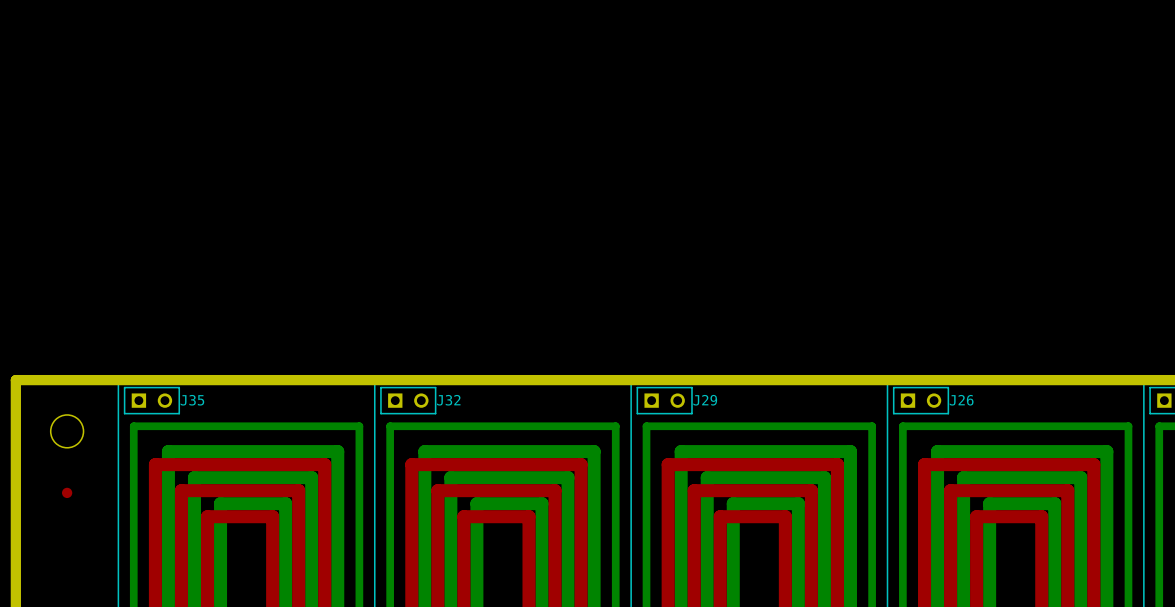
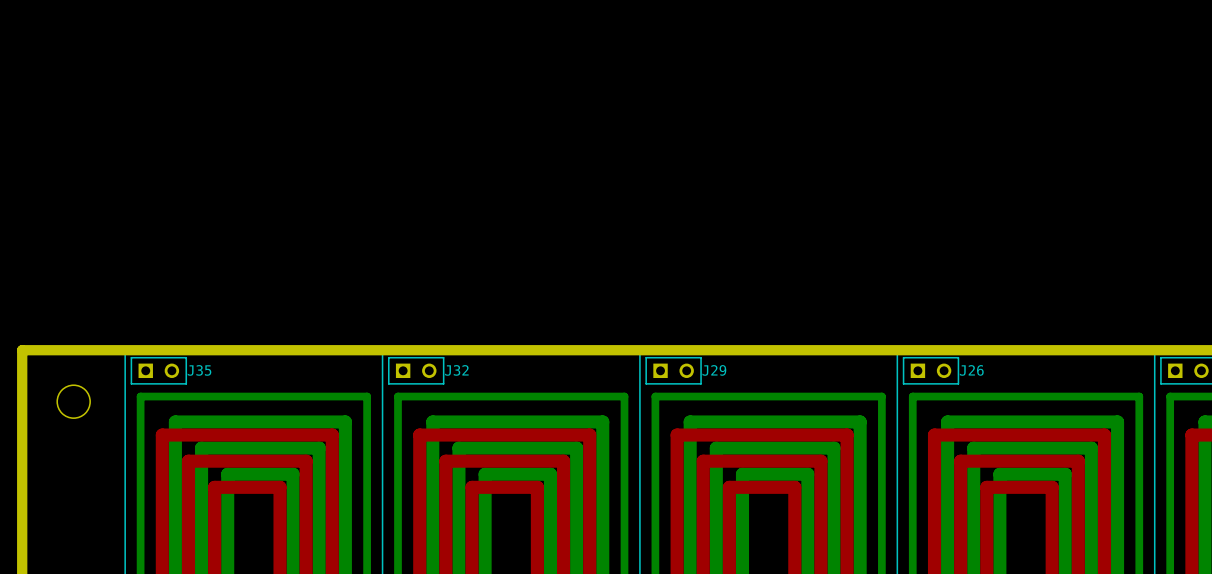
part: (67, 492) -> none

